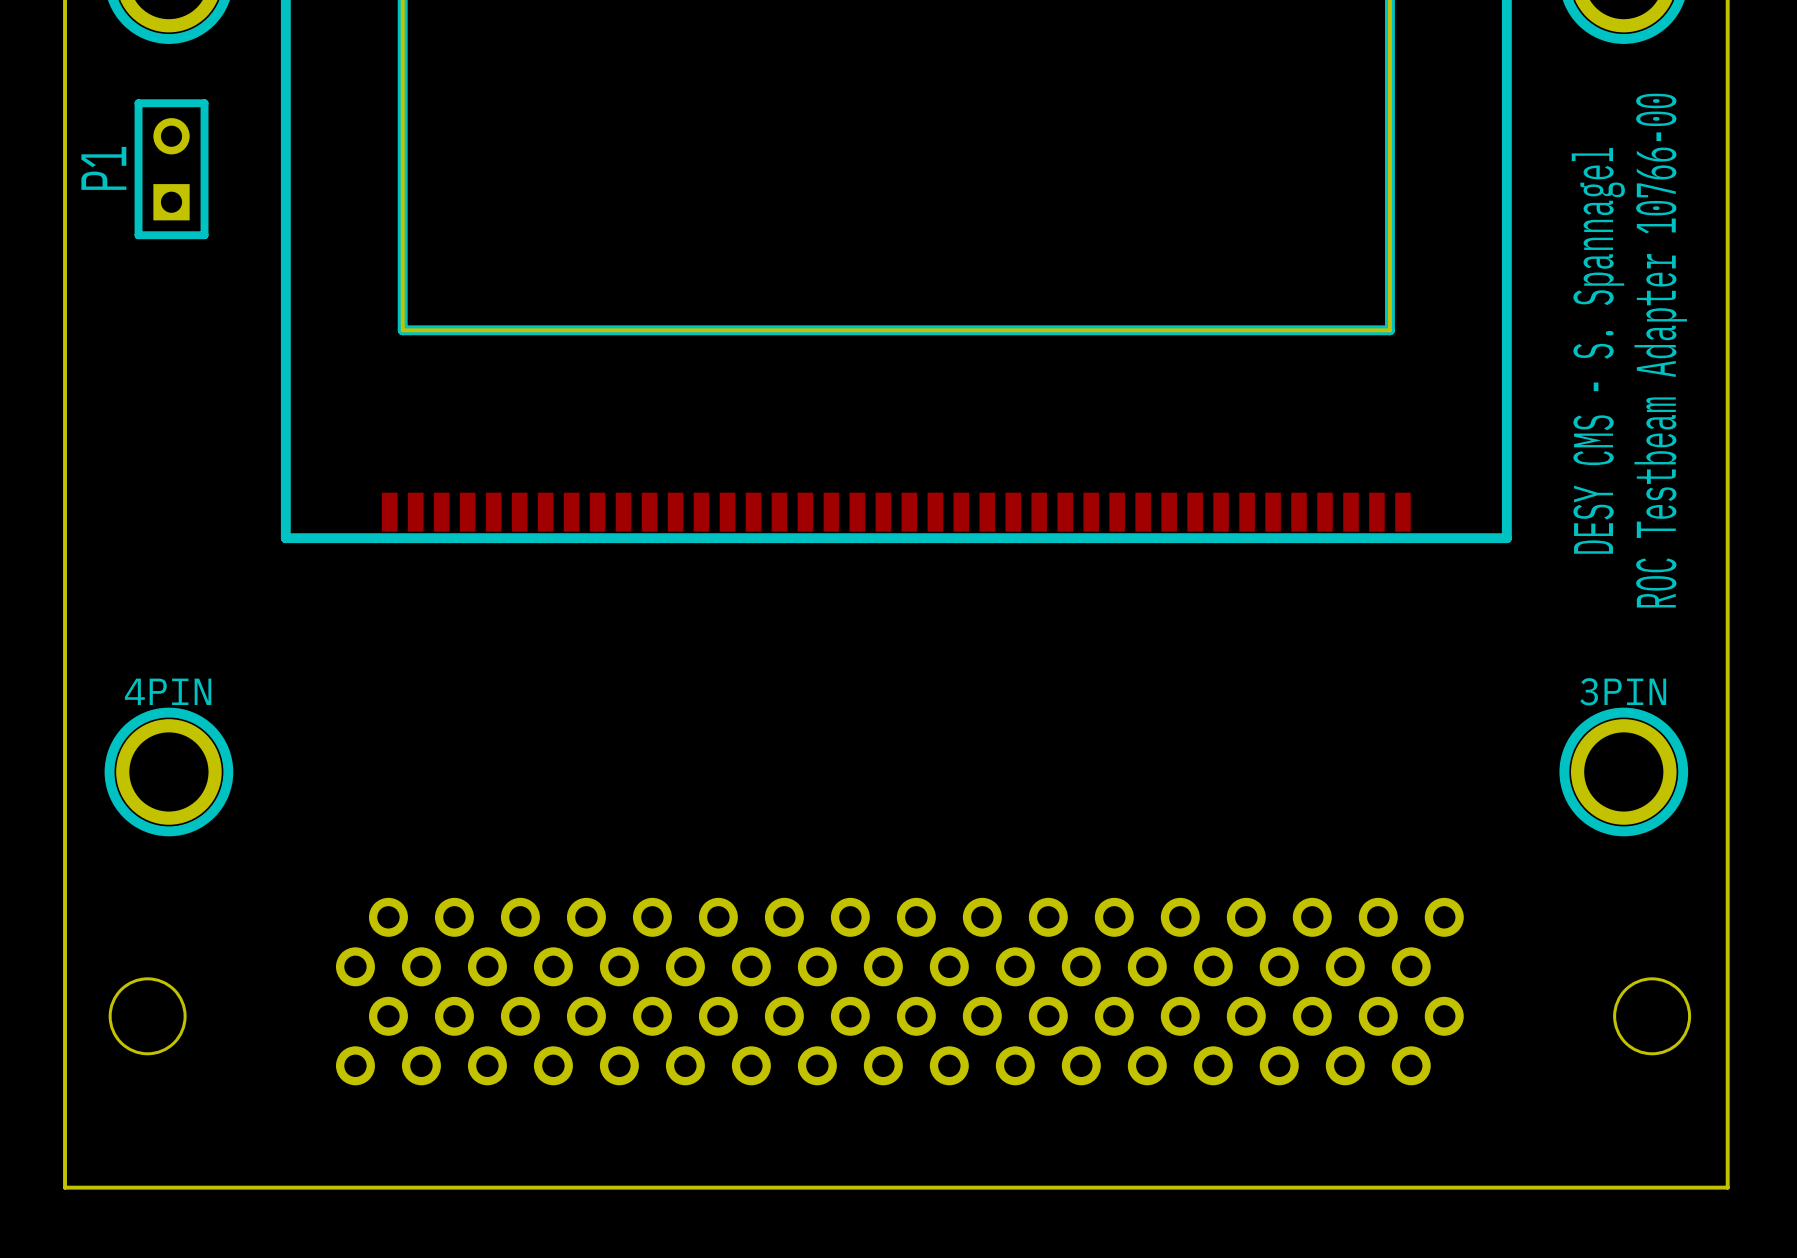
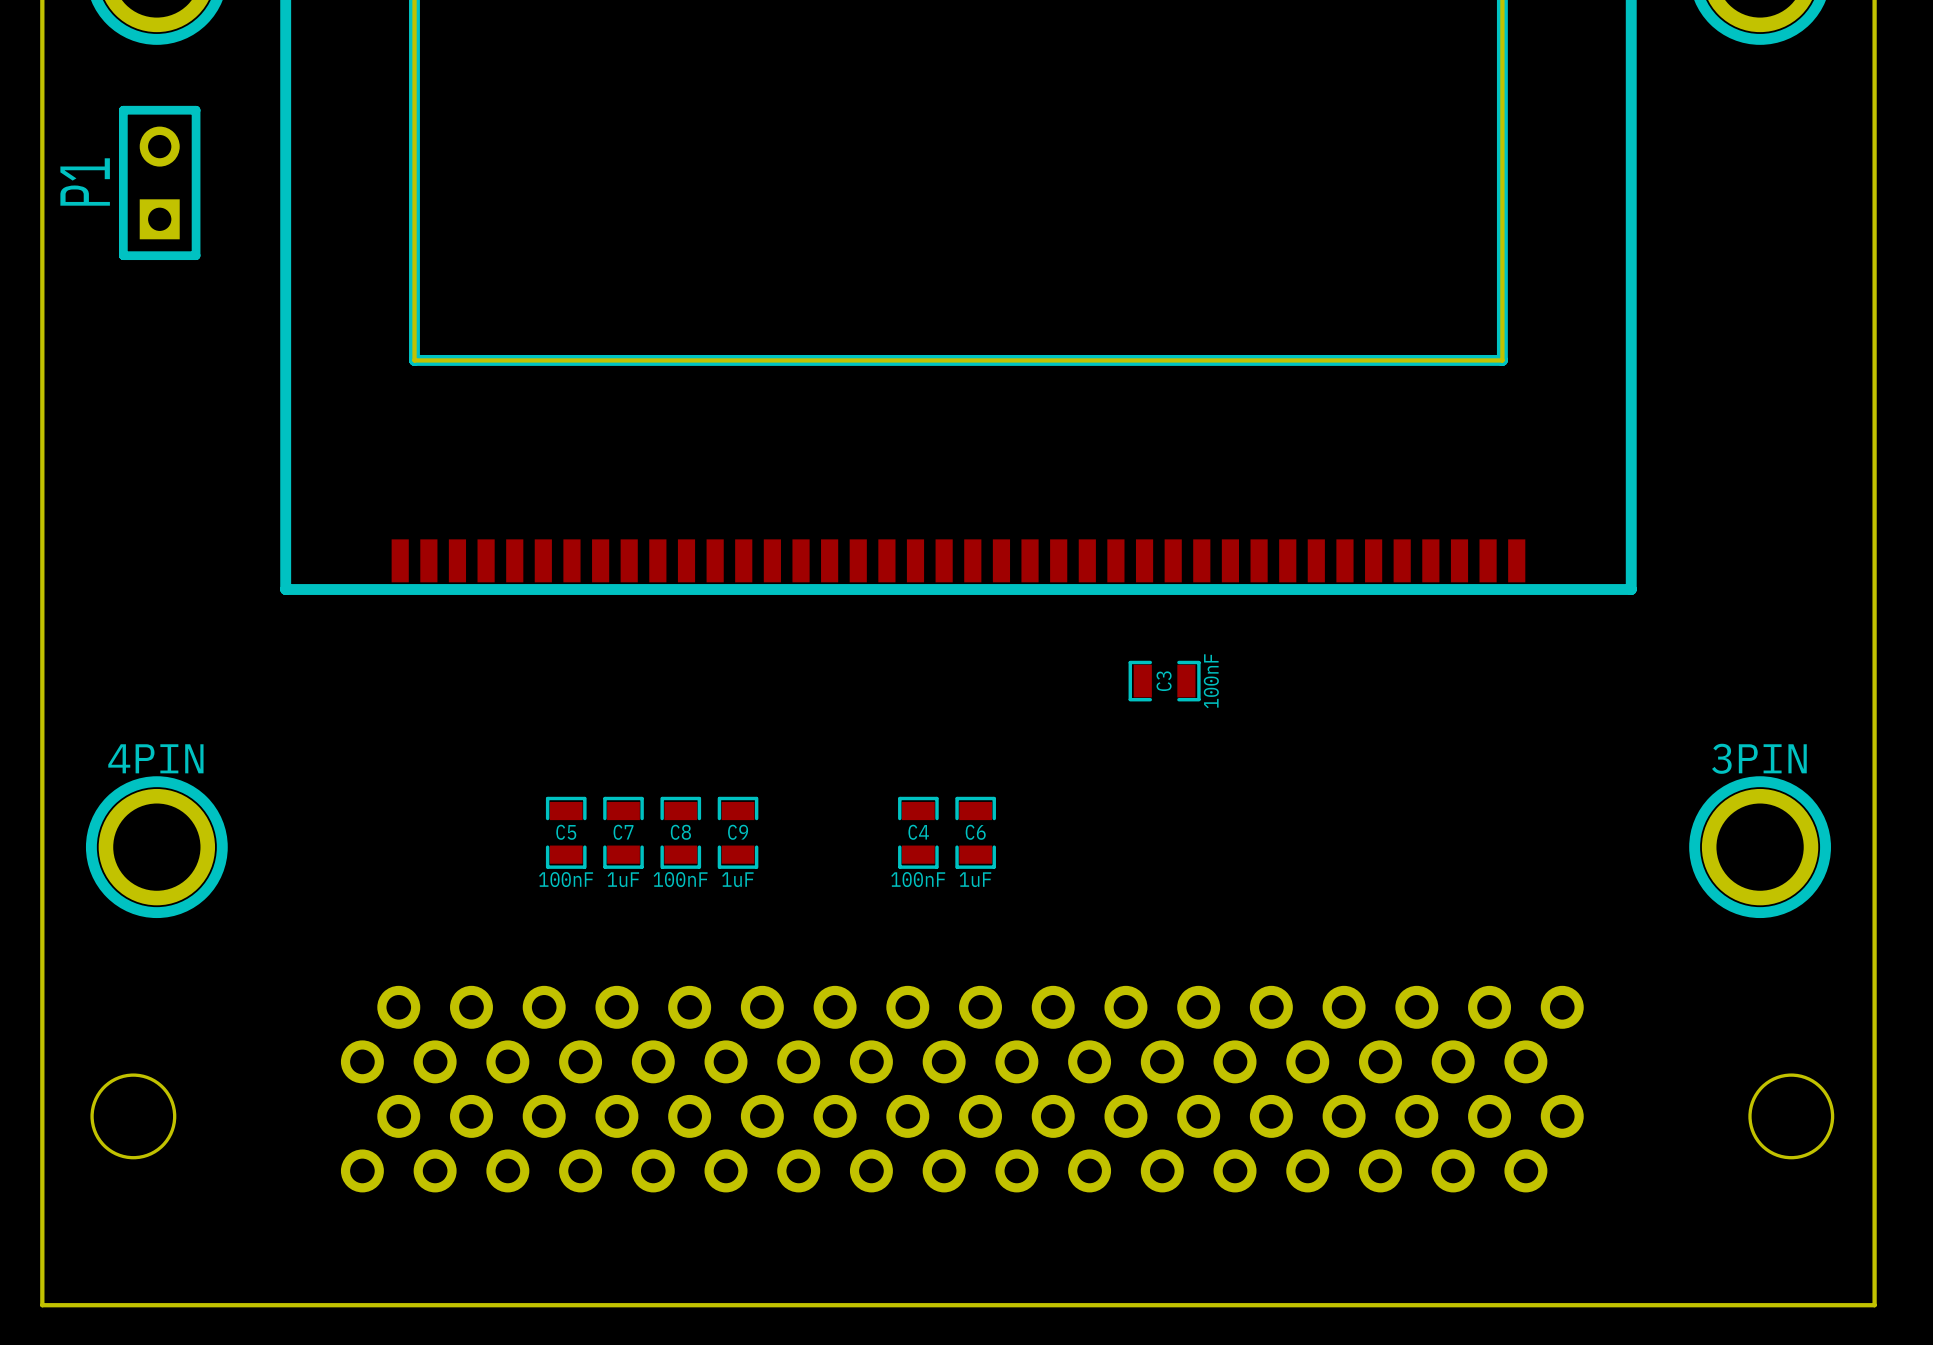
text: DESY CMS - S. Spannagel (1598, 350) -> none
text: ROC Testbeam Adapter 10766-00 (1660, 350) -> none
C3: none -> 100nF (1164, 681)
C5: none -> 100nF (566, 832)
C7: none -> 1uF (623, 832)
C8: none -> 100nF (680, 832)
C9: none -> 1uF (738, 832)
C4: none -> 100nF (918, 832)
C6: none -> 1uF (975, 832)

